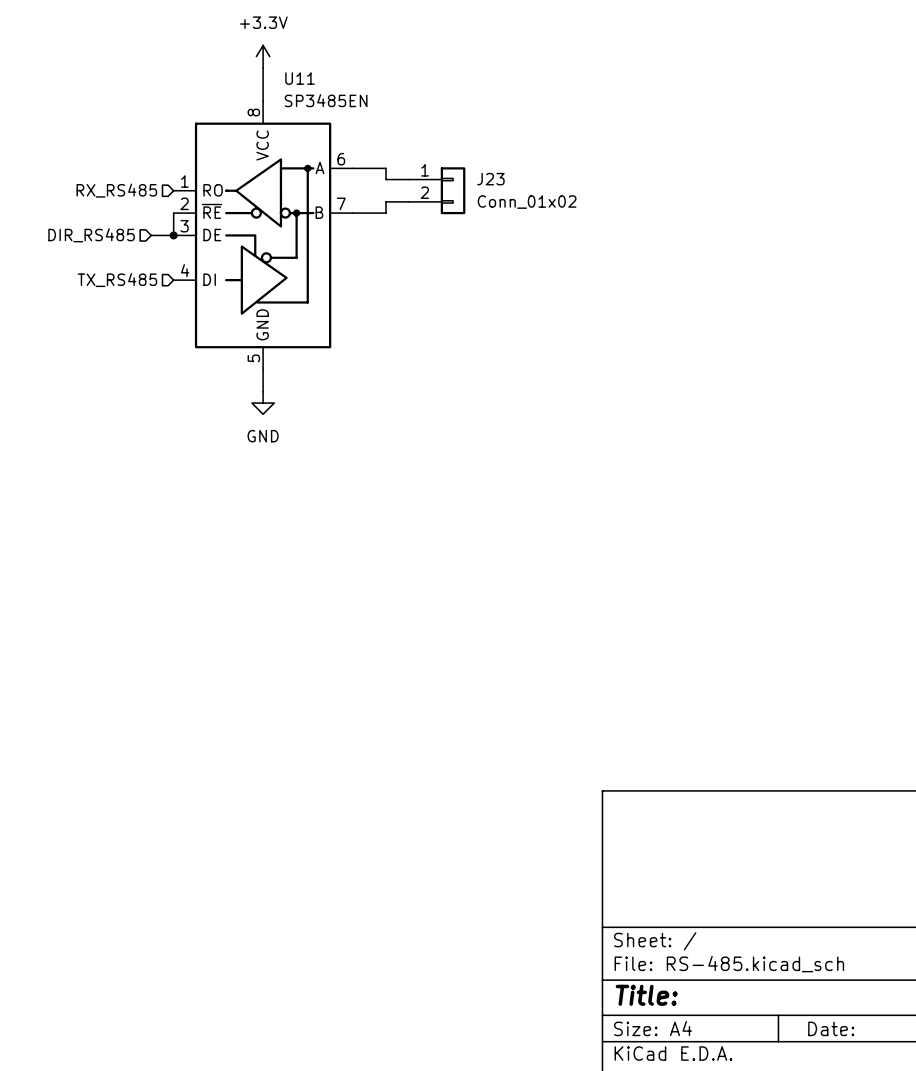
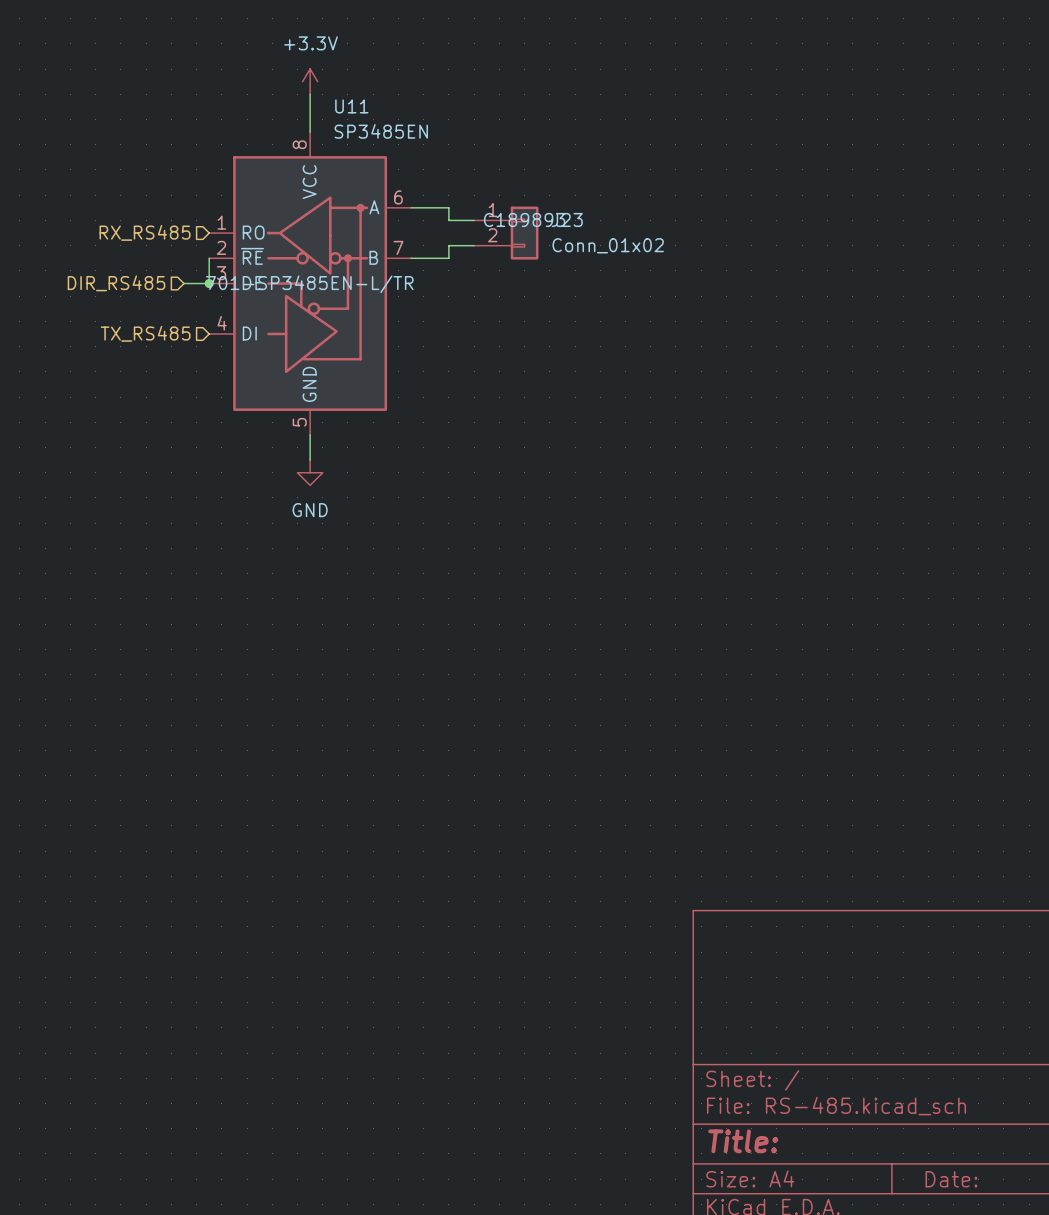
J23 text: none -> C189893 (524, 219)
U11 text: none -> 701-SP3485EN-L/TR (309, 284)

